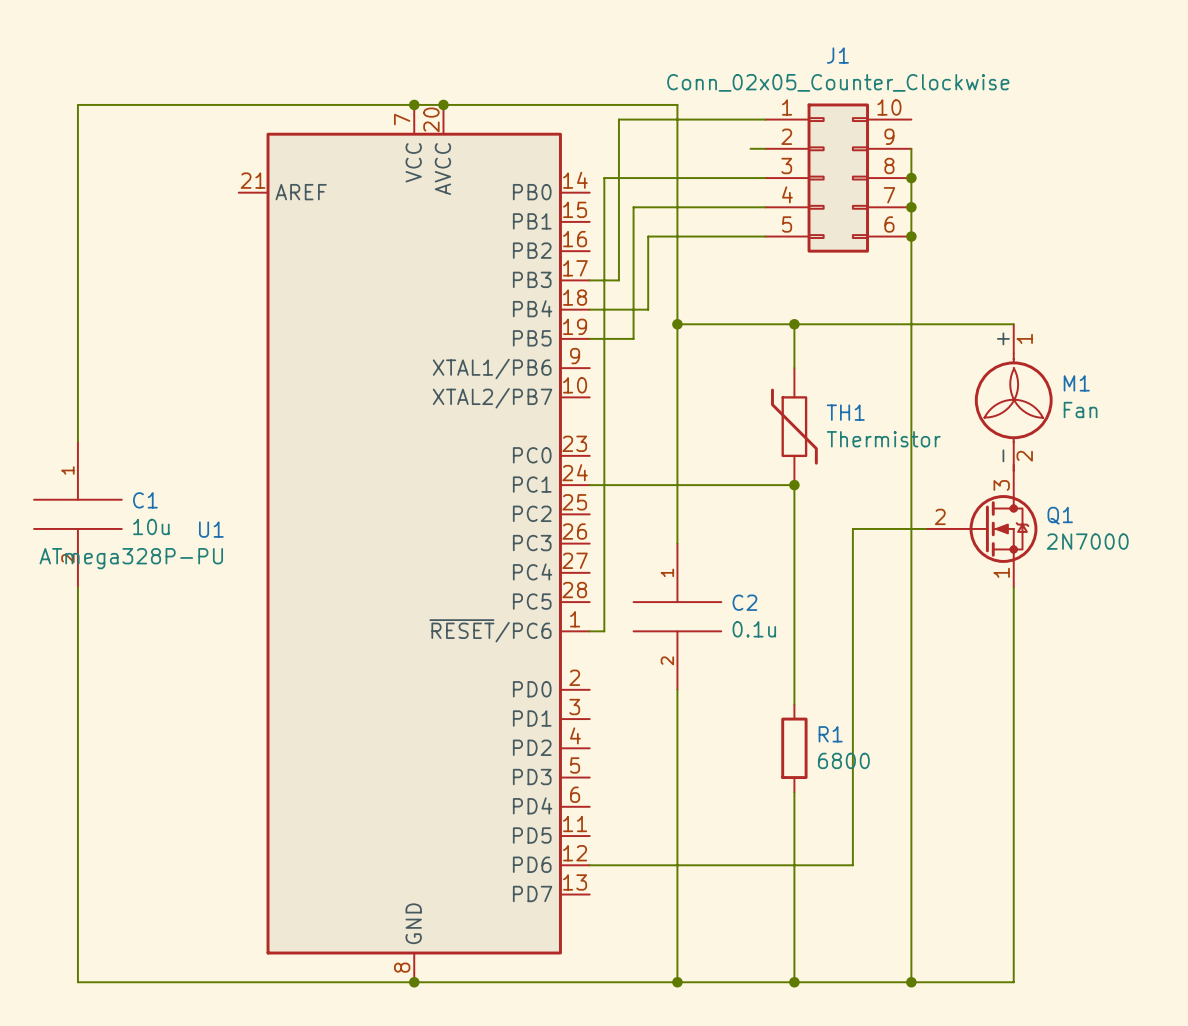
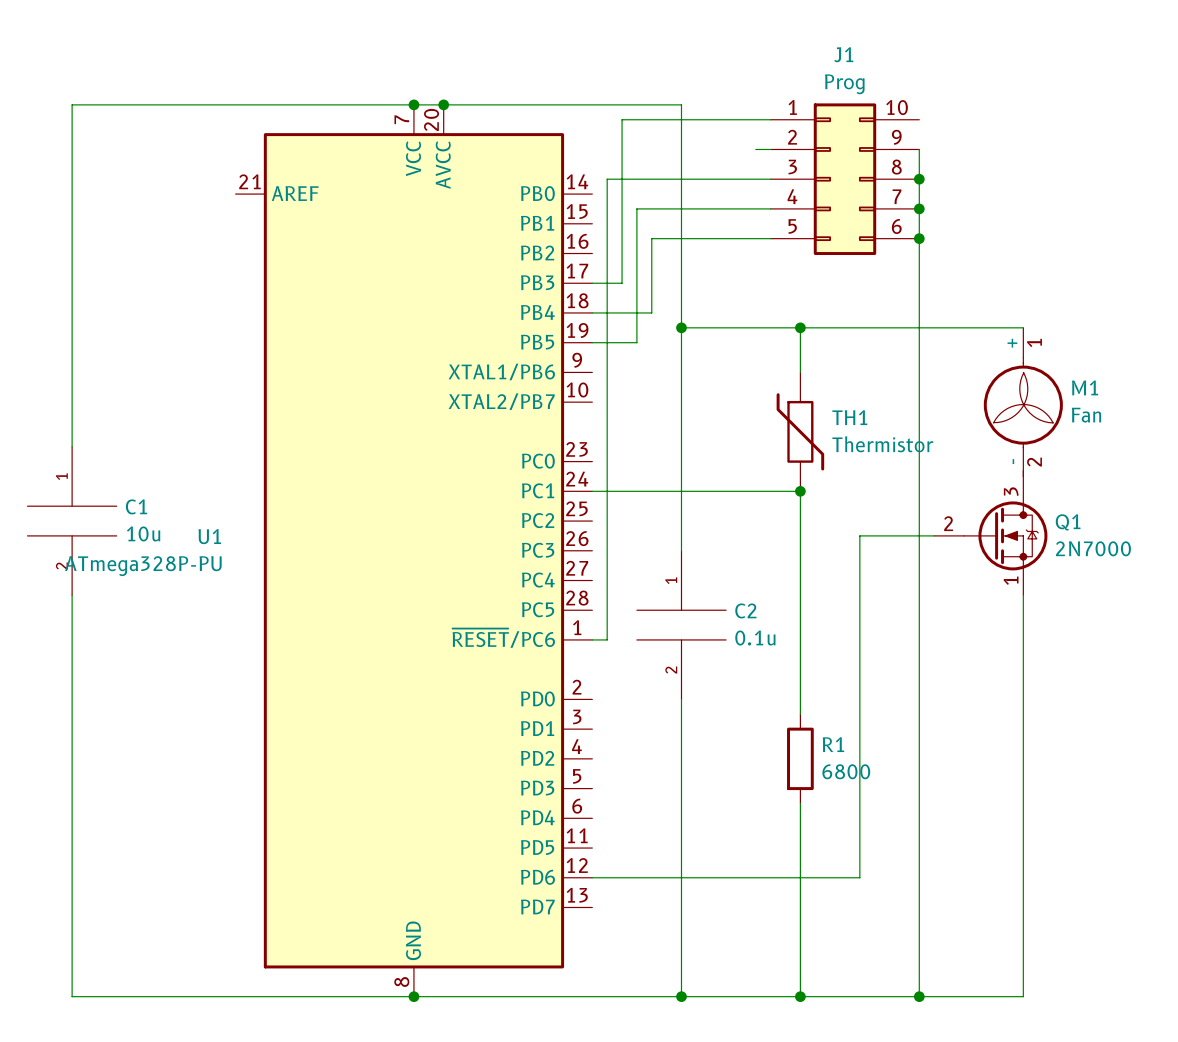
J1 value: Conn_02x05_Counter_Clockwise (838, 82) -> Prog (844, 84)

